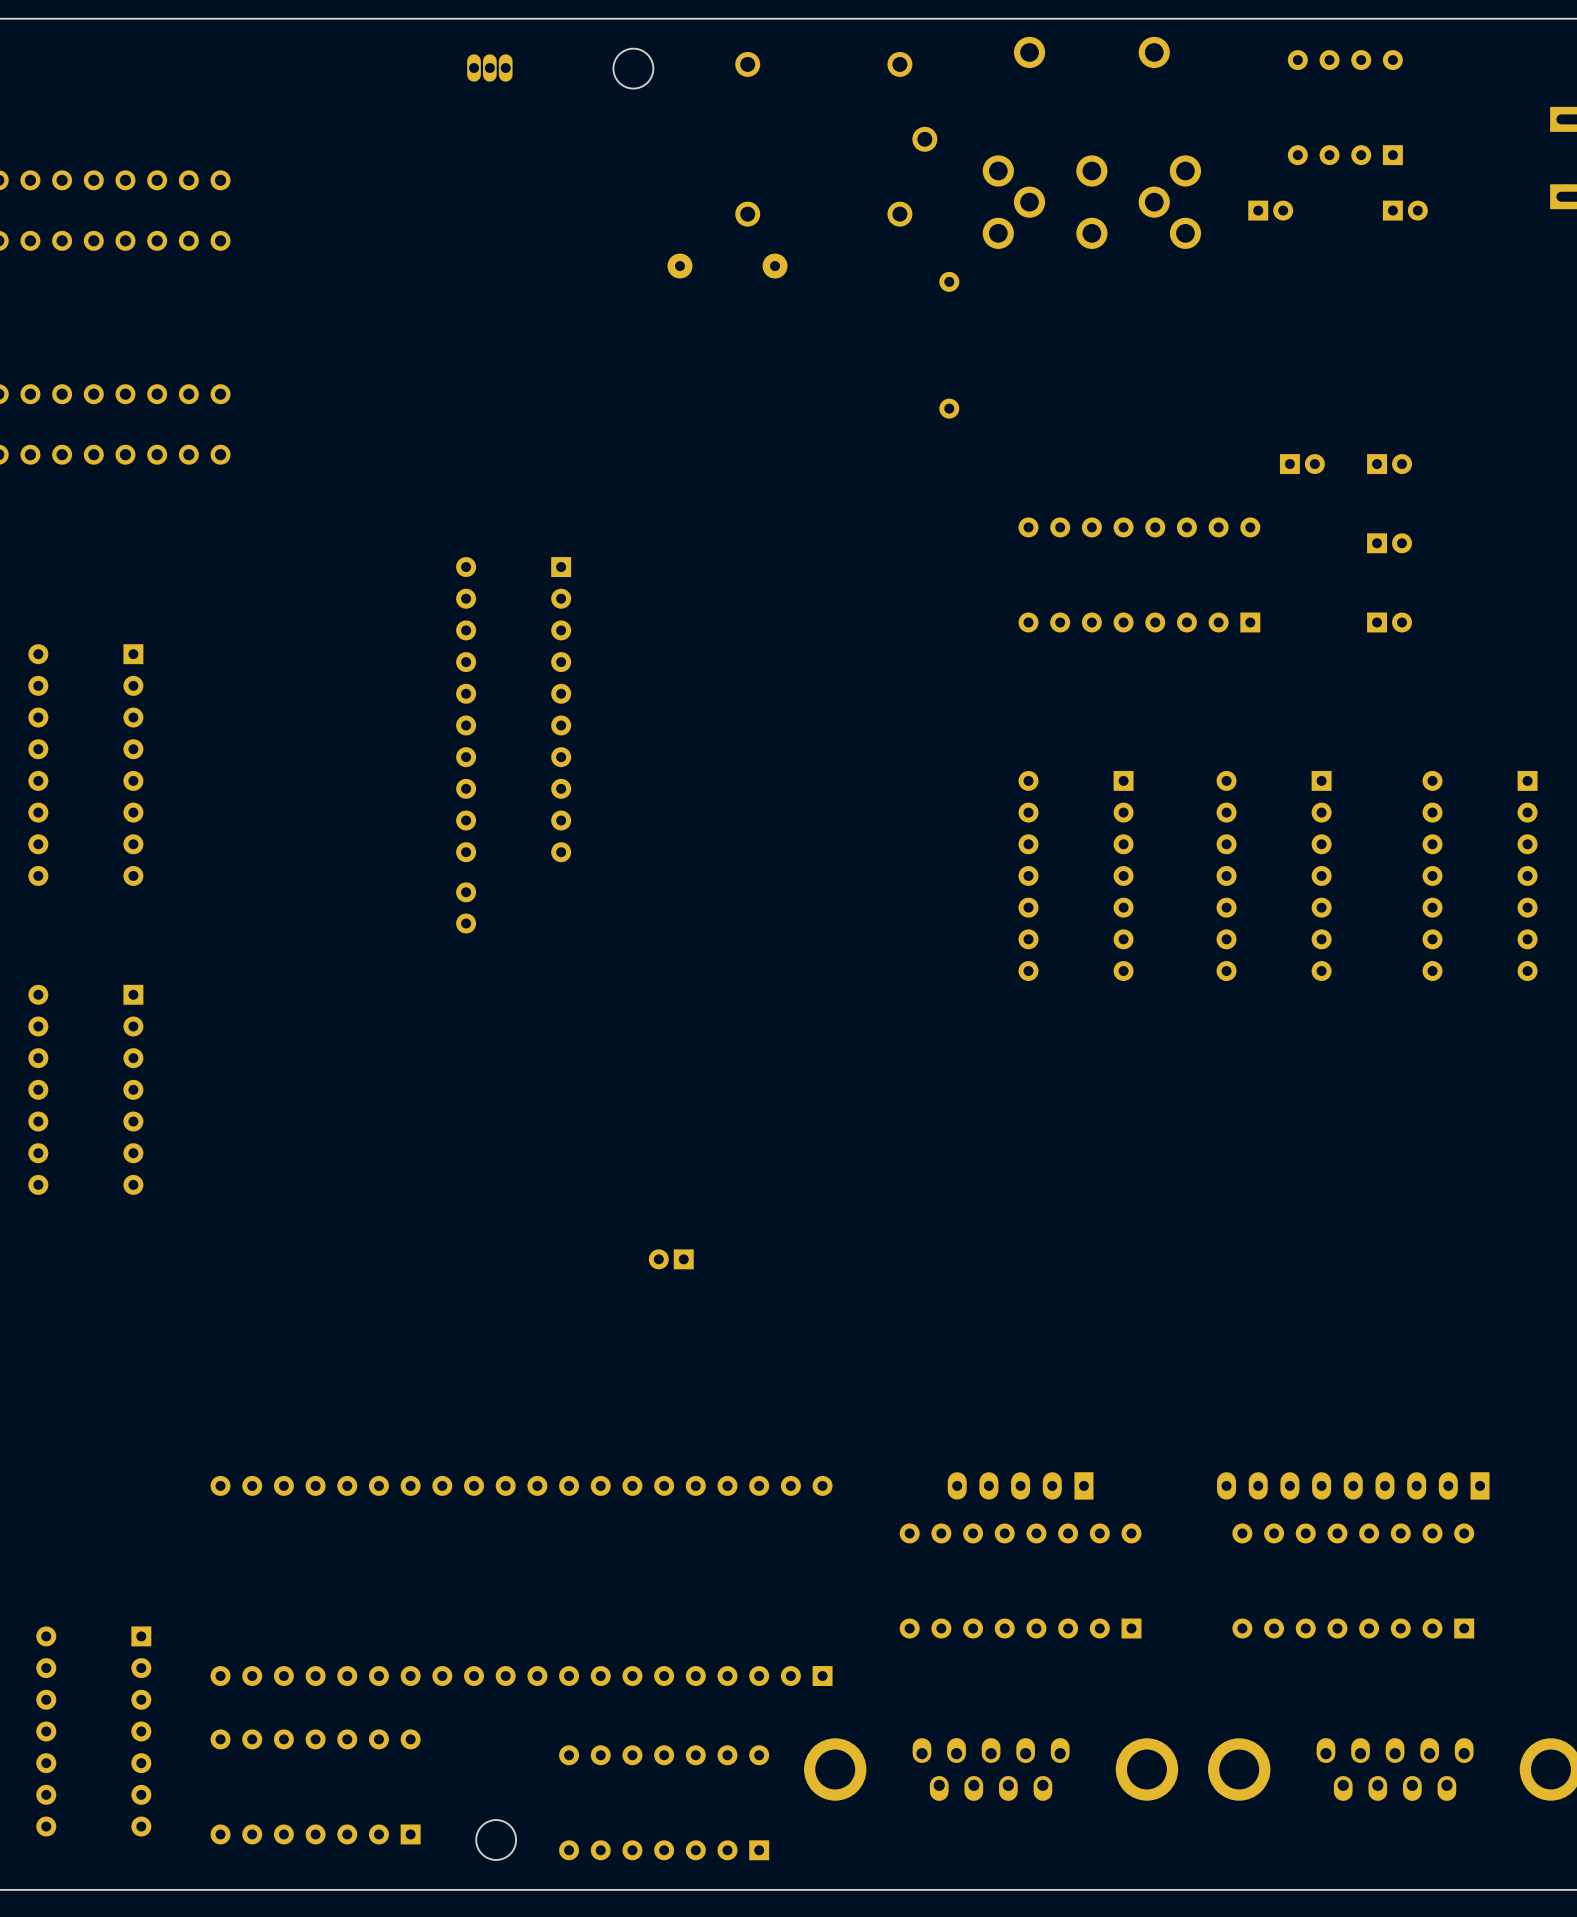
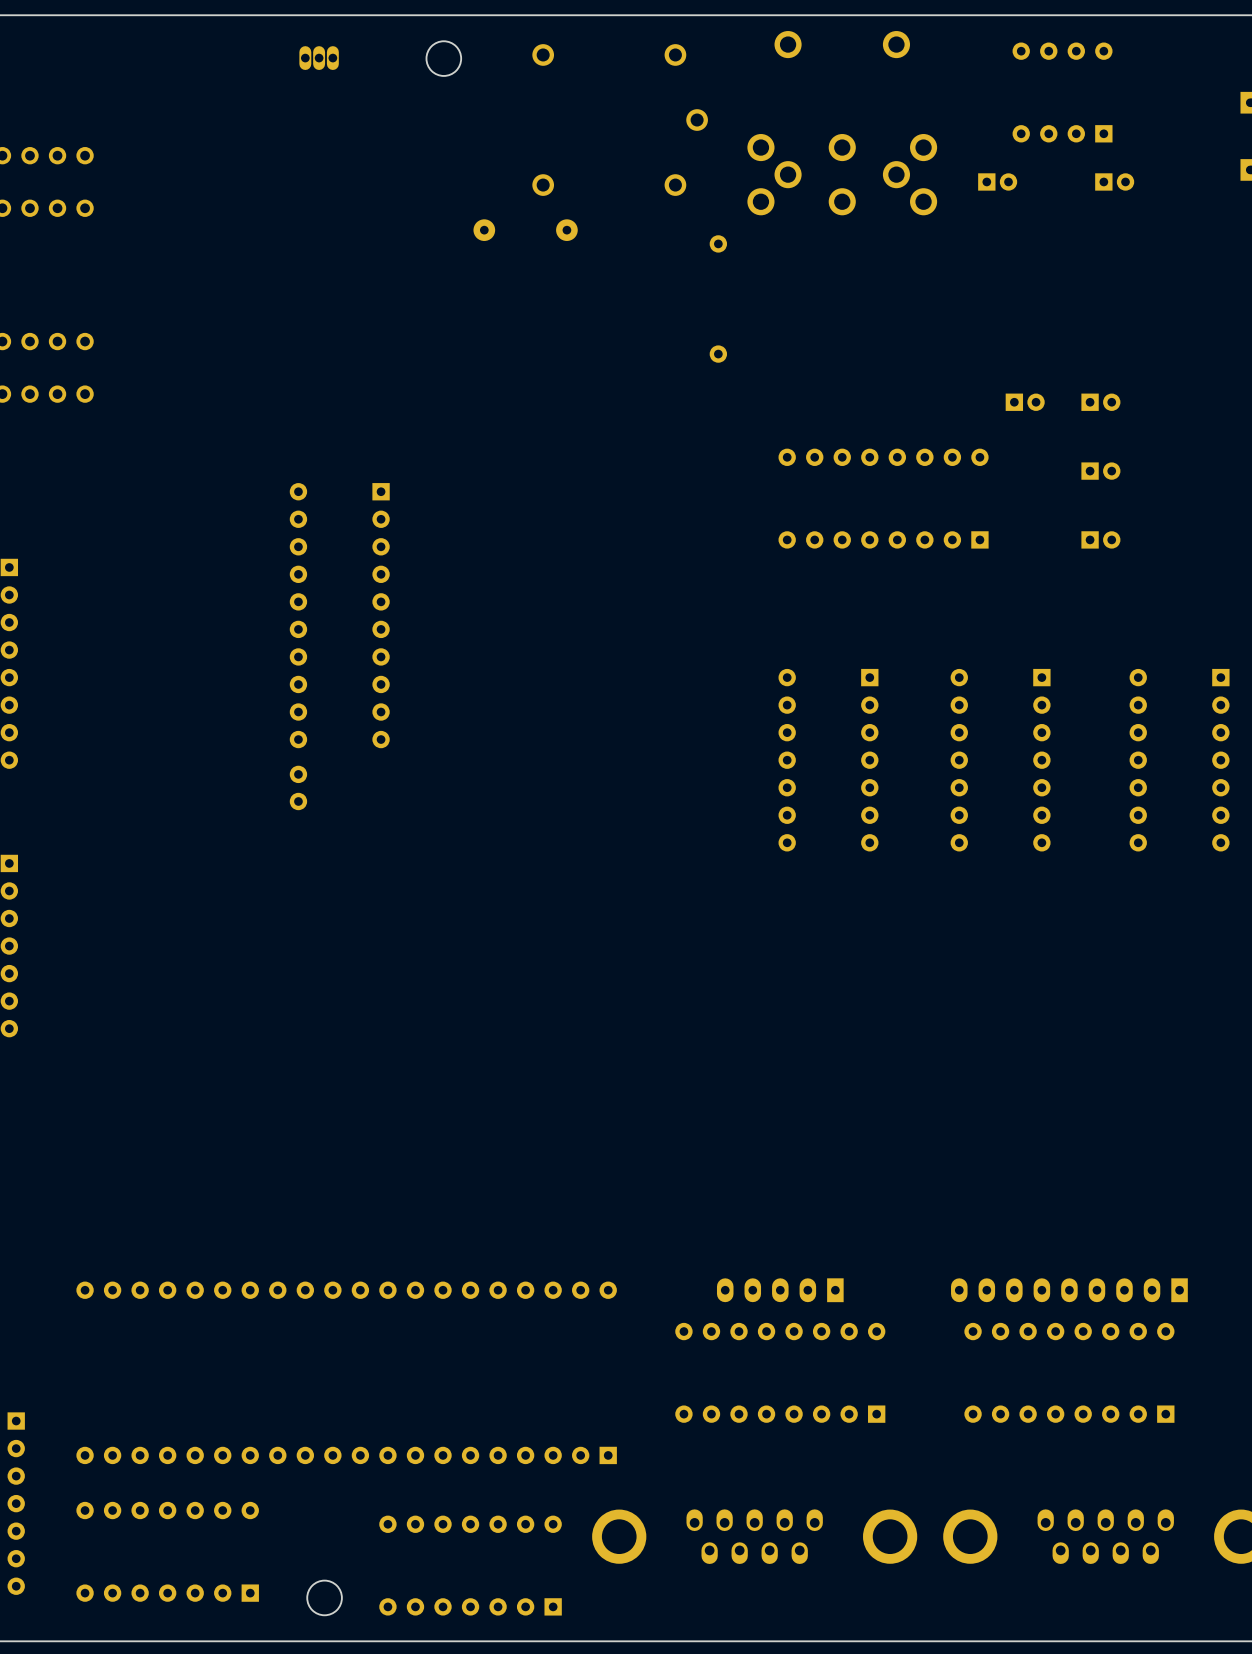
part: (671, 1259) -> none

